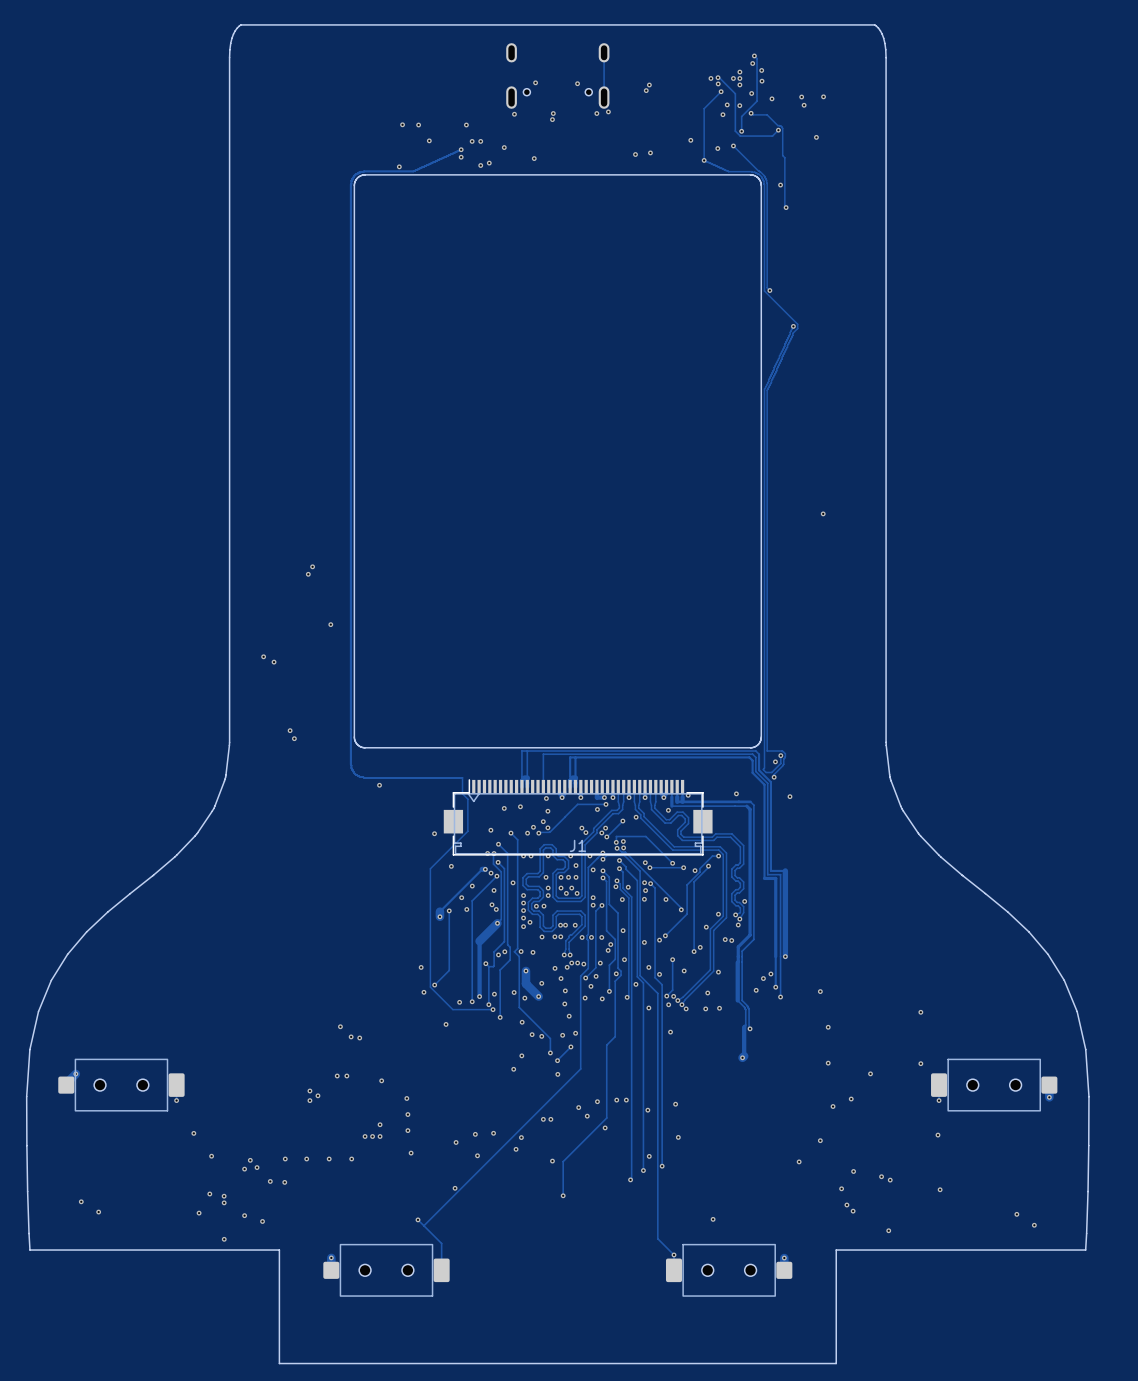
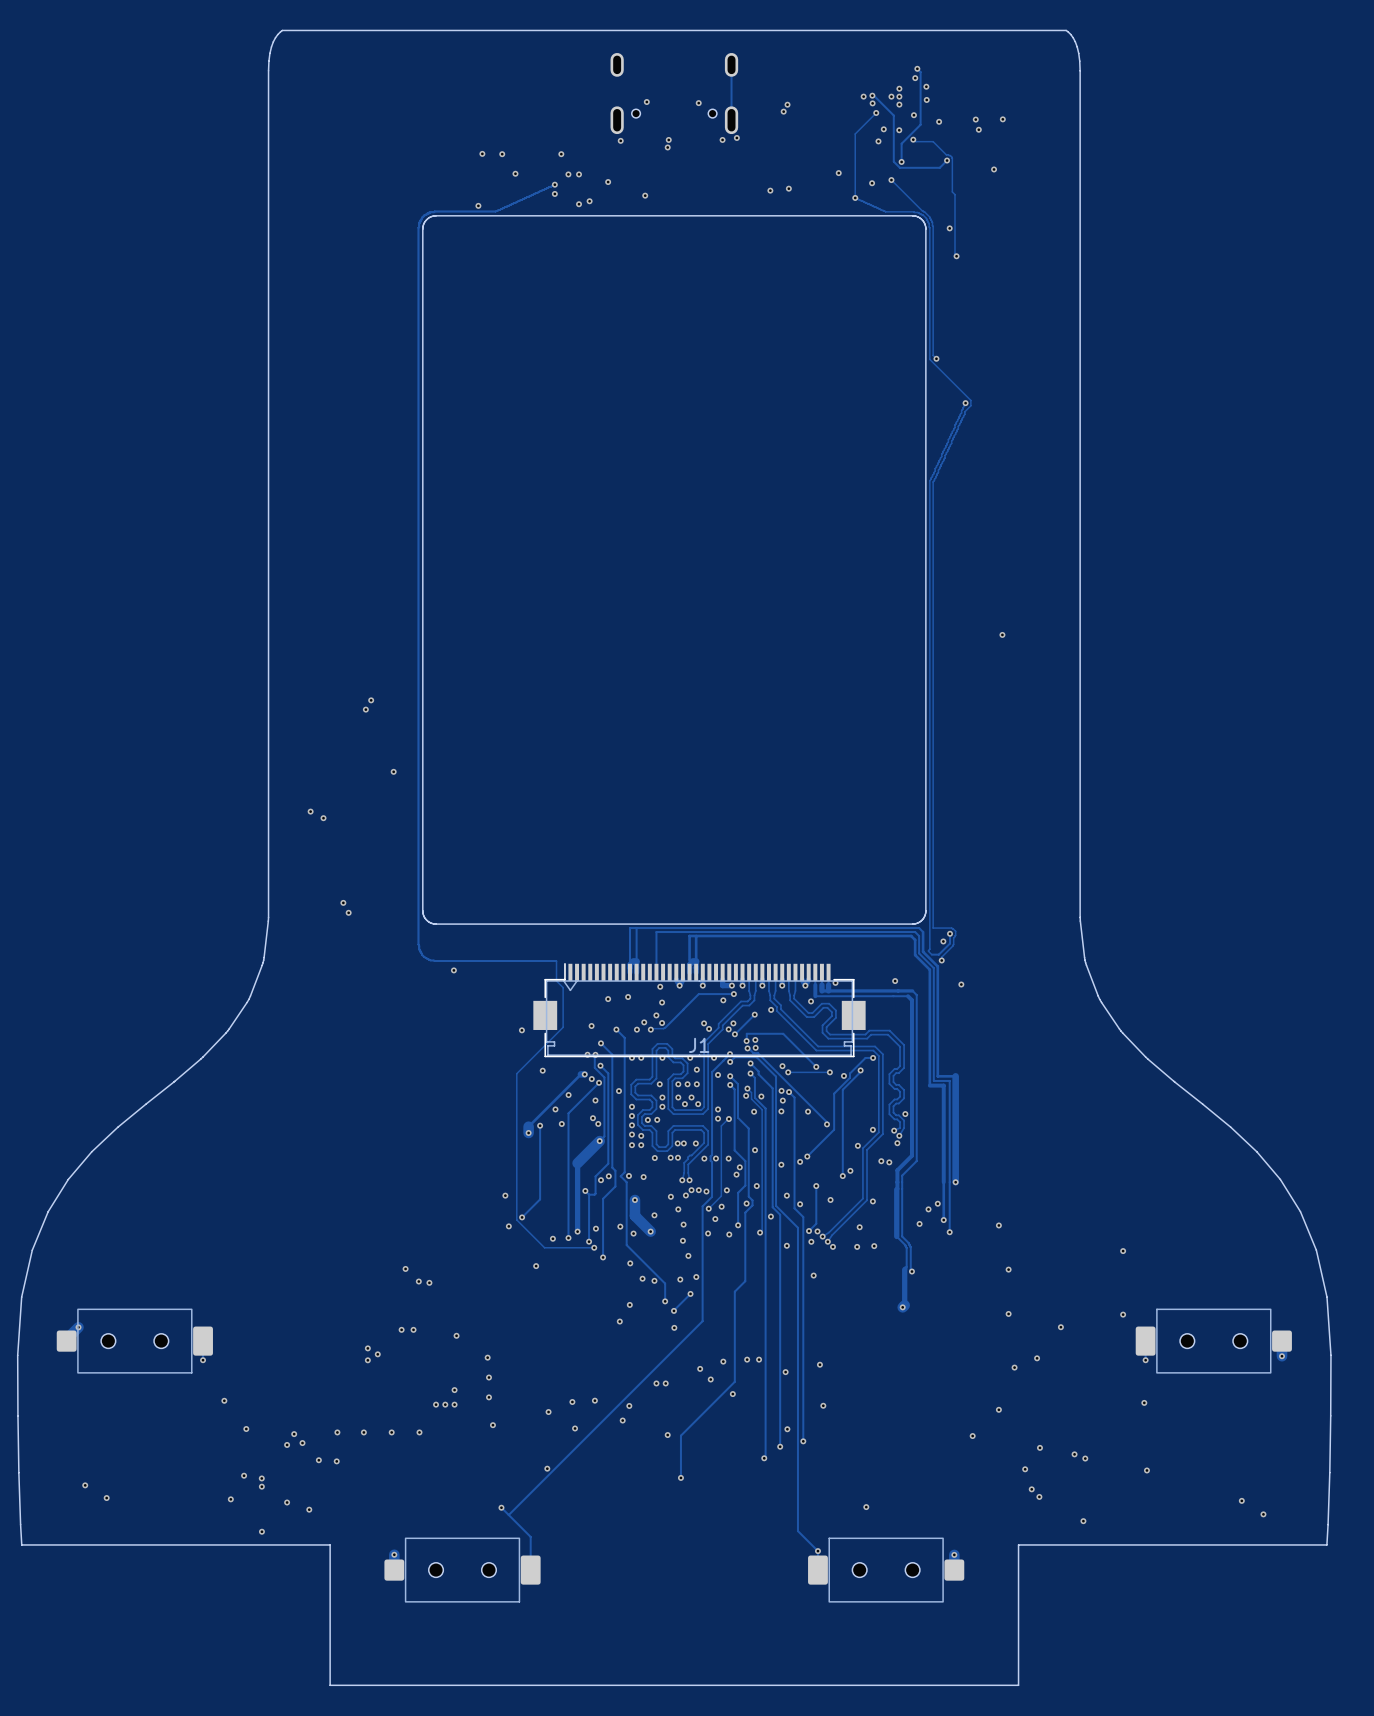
via: none -> (641, 1135)
via: (529, 922) -> none
via: none -> (641, 1145)

